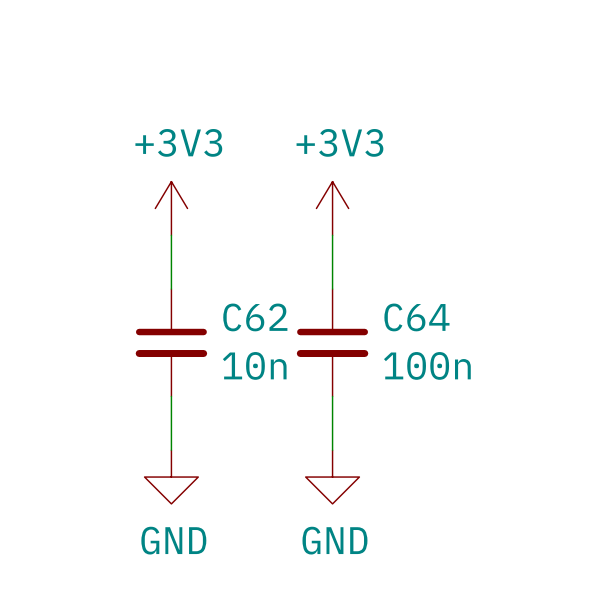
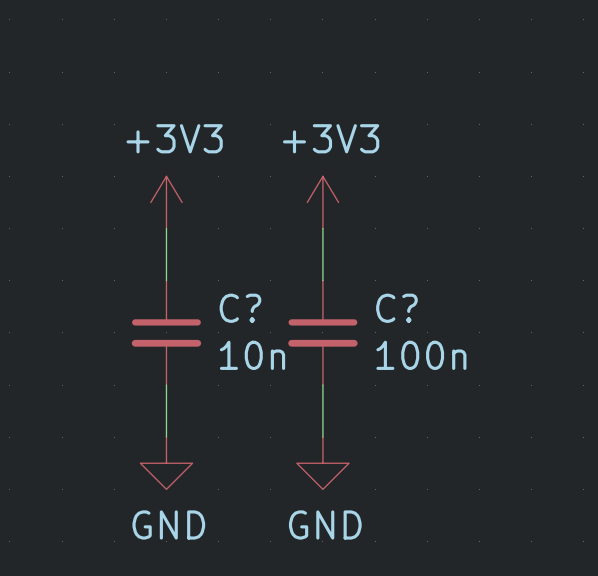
C62 name: C62 (255, 317) -> C? (240, 308)
C64 name: C64 (416, 317) -> C? (396, 308)

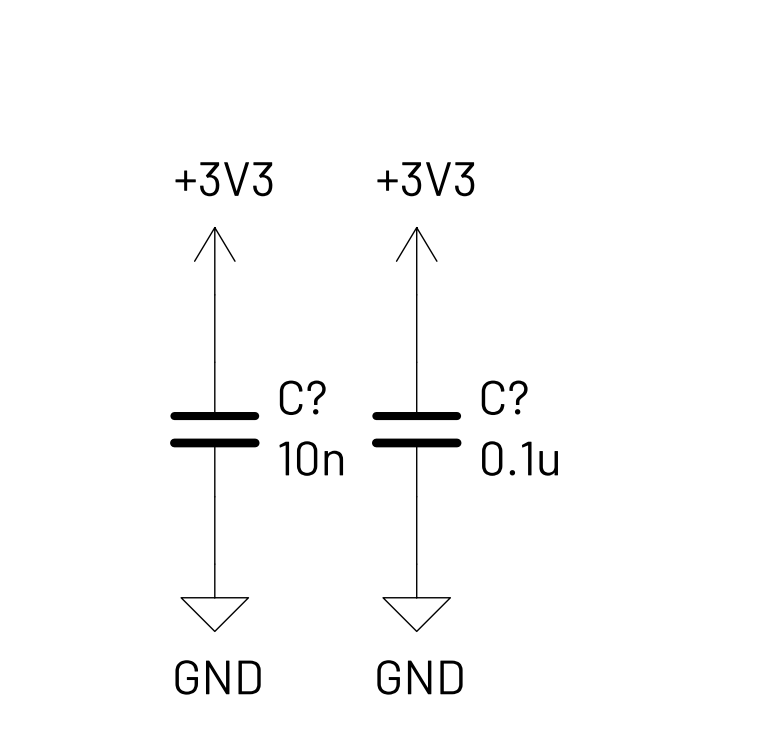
C? value: 100n (421, 355) -> 0.1u (520, 458)

